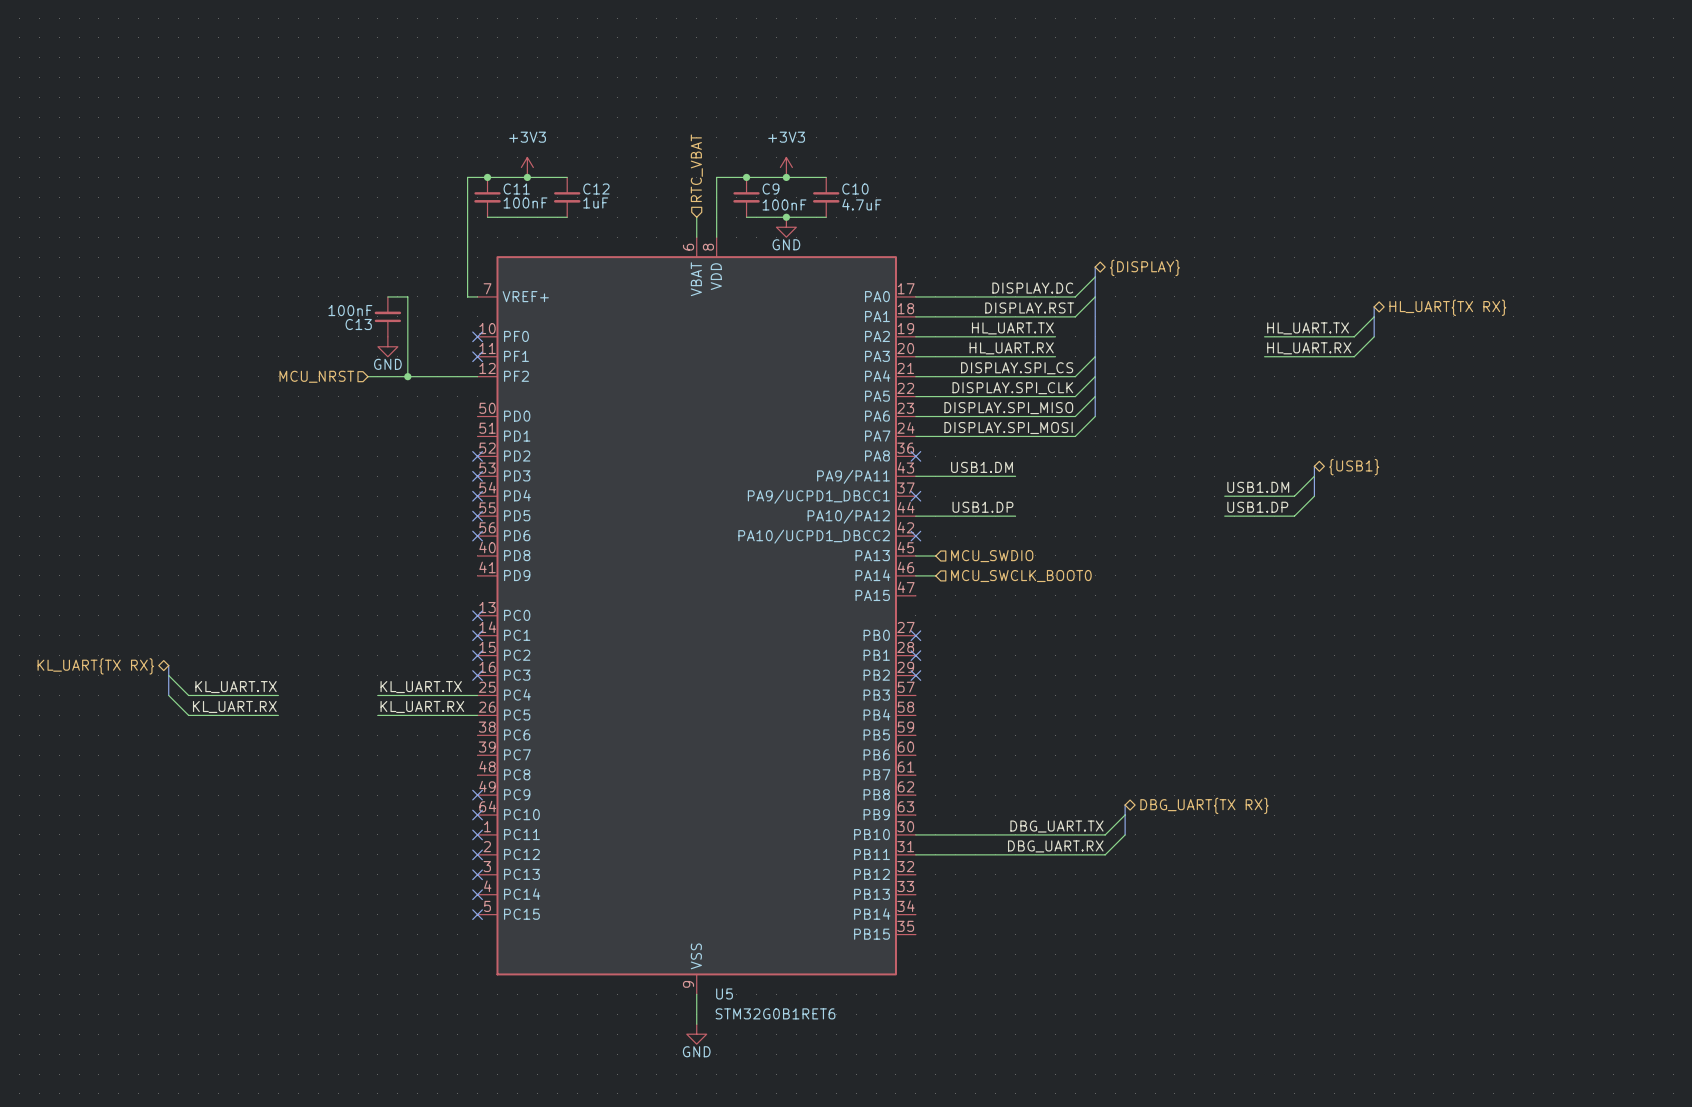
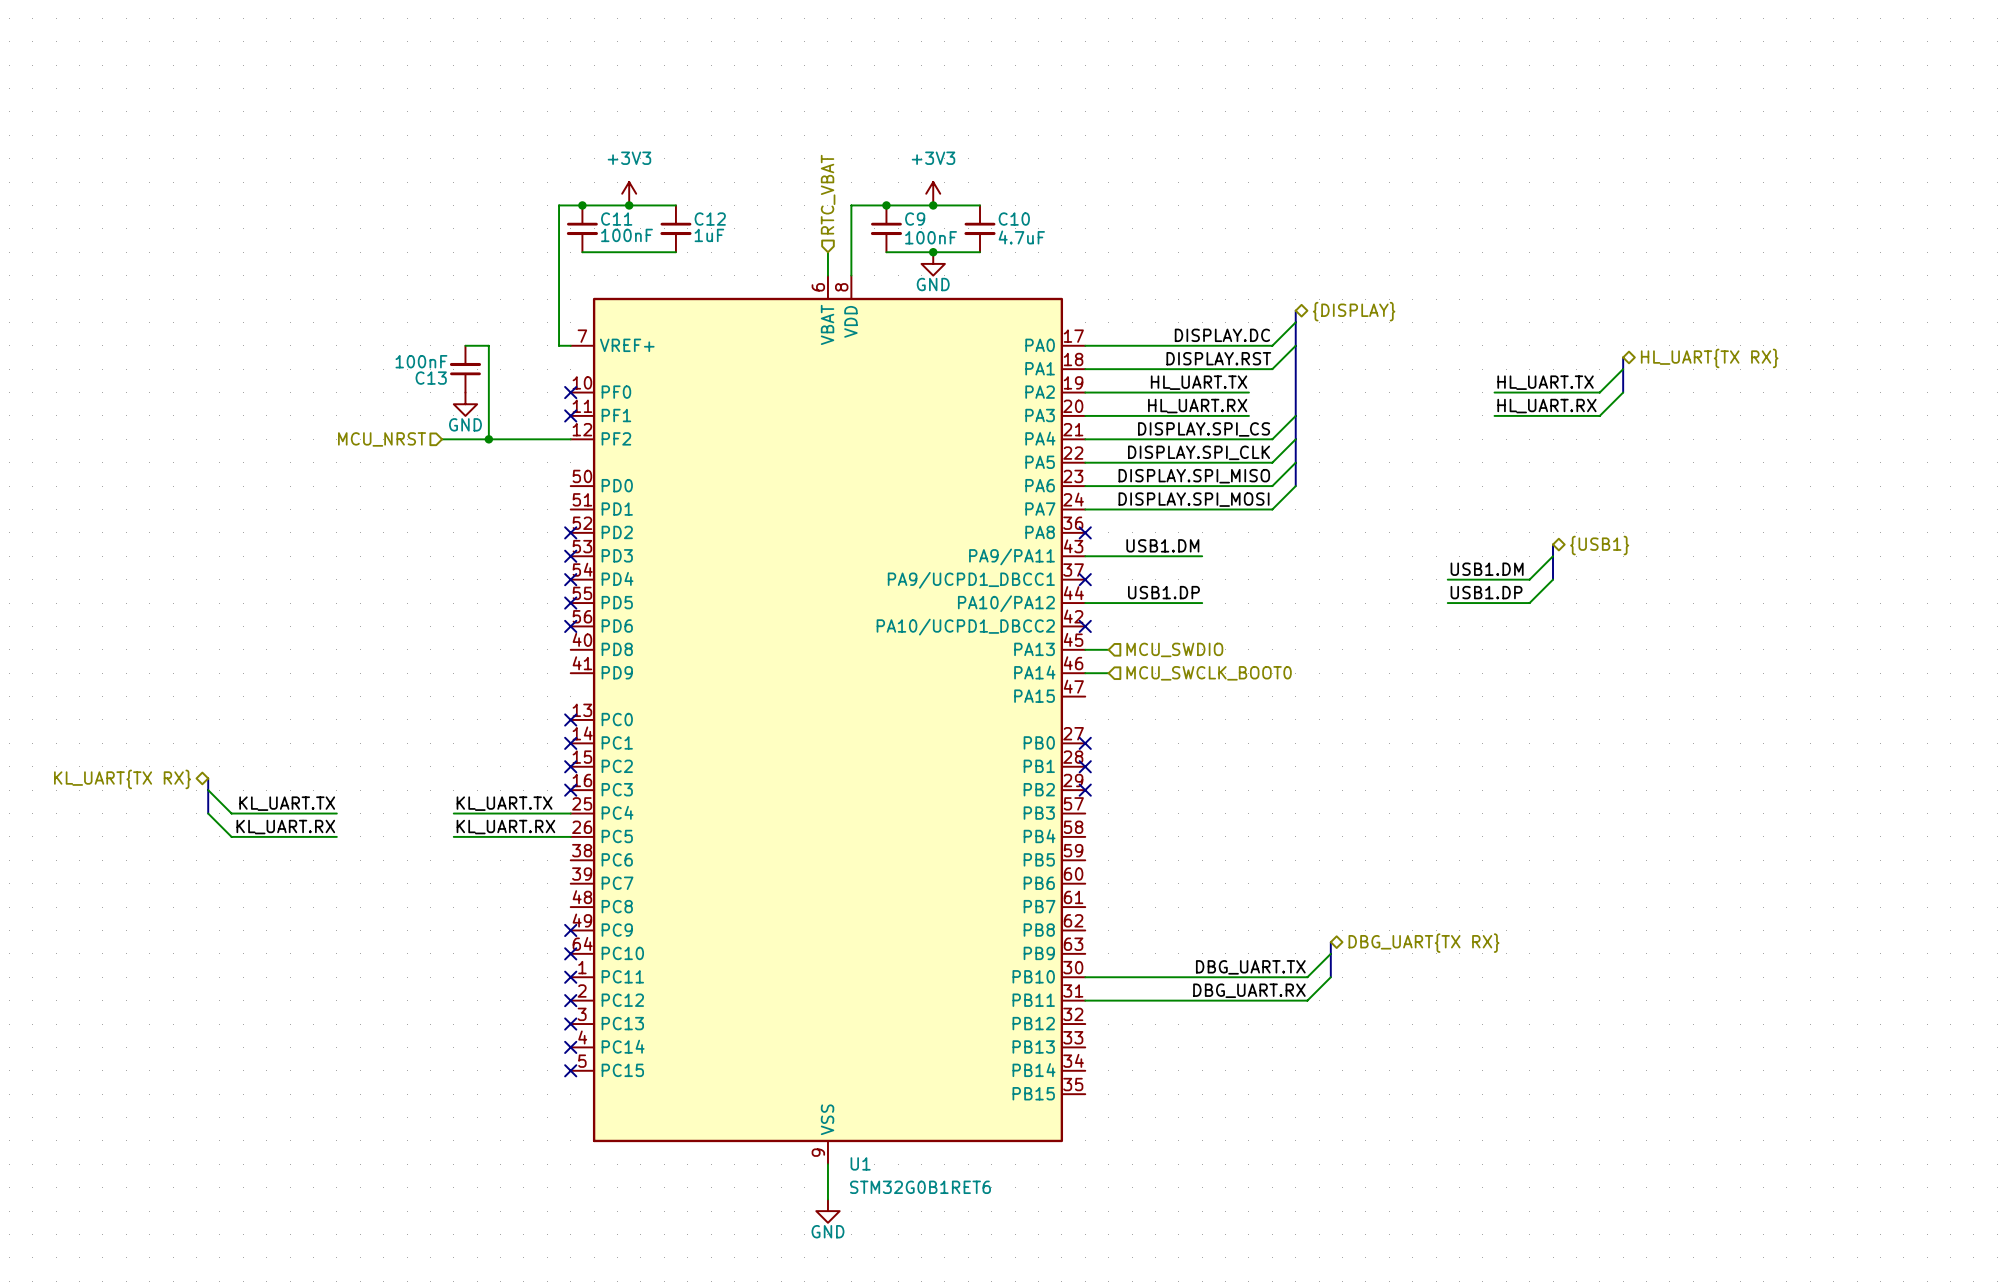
U5 name: U5 (724, 993) -> U1 (860, 1163)

